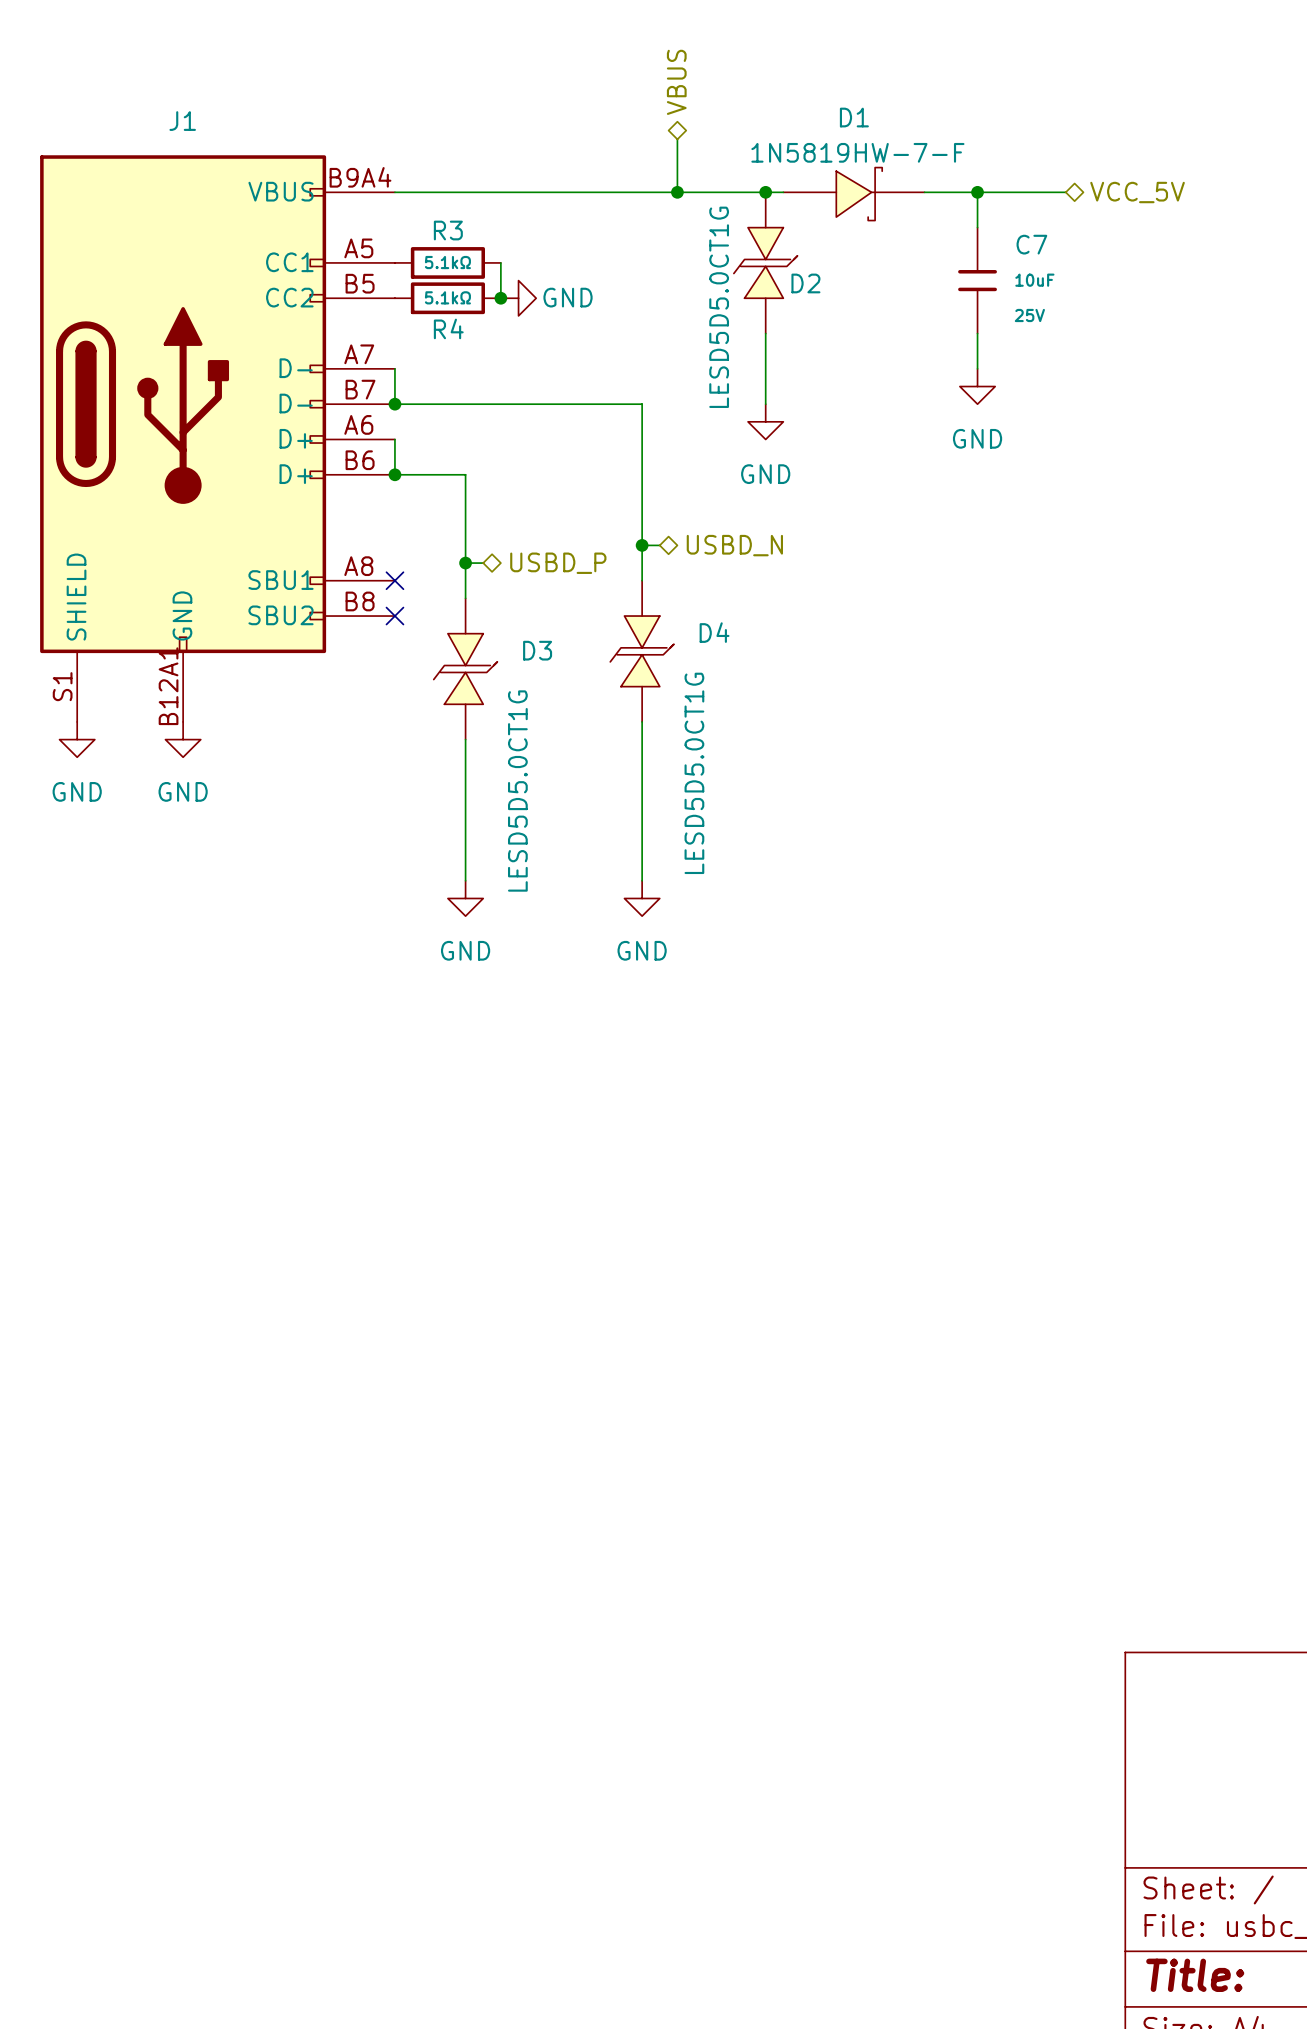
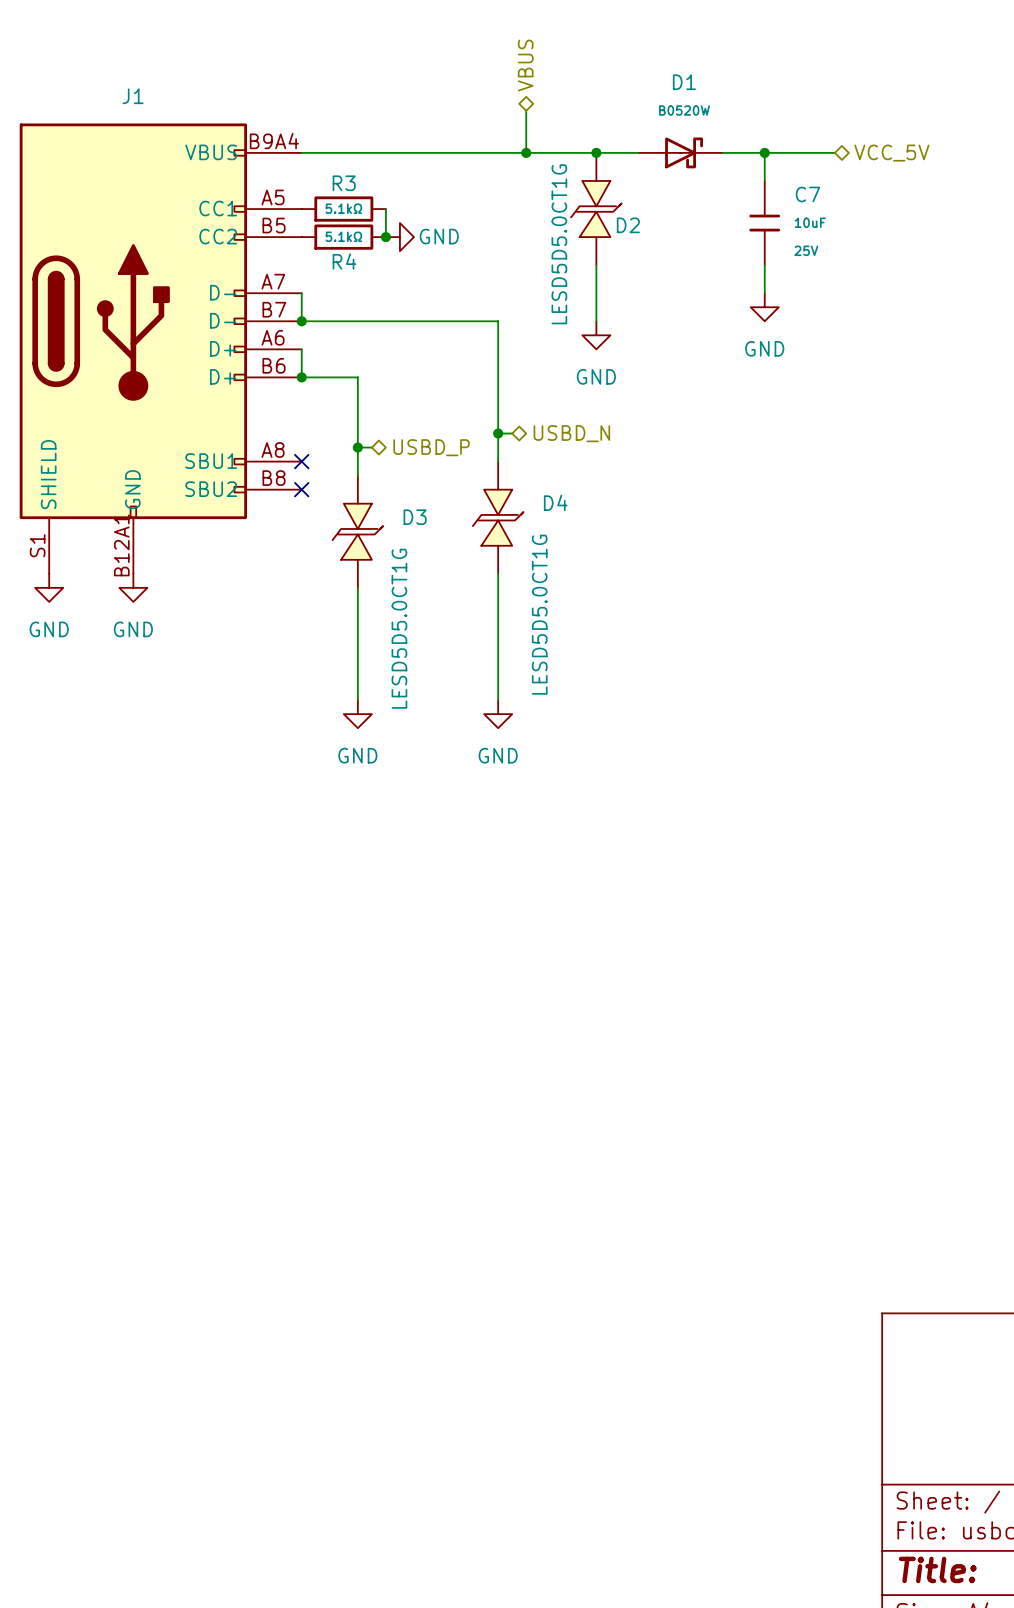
D1 value: 1N5819HW-7-F (857, 152) -> B0520W (684, 110)
D1 symbol: [783, 167, 925, 221] -> [638, 137, 723, 169]

